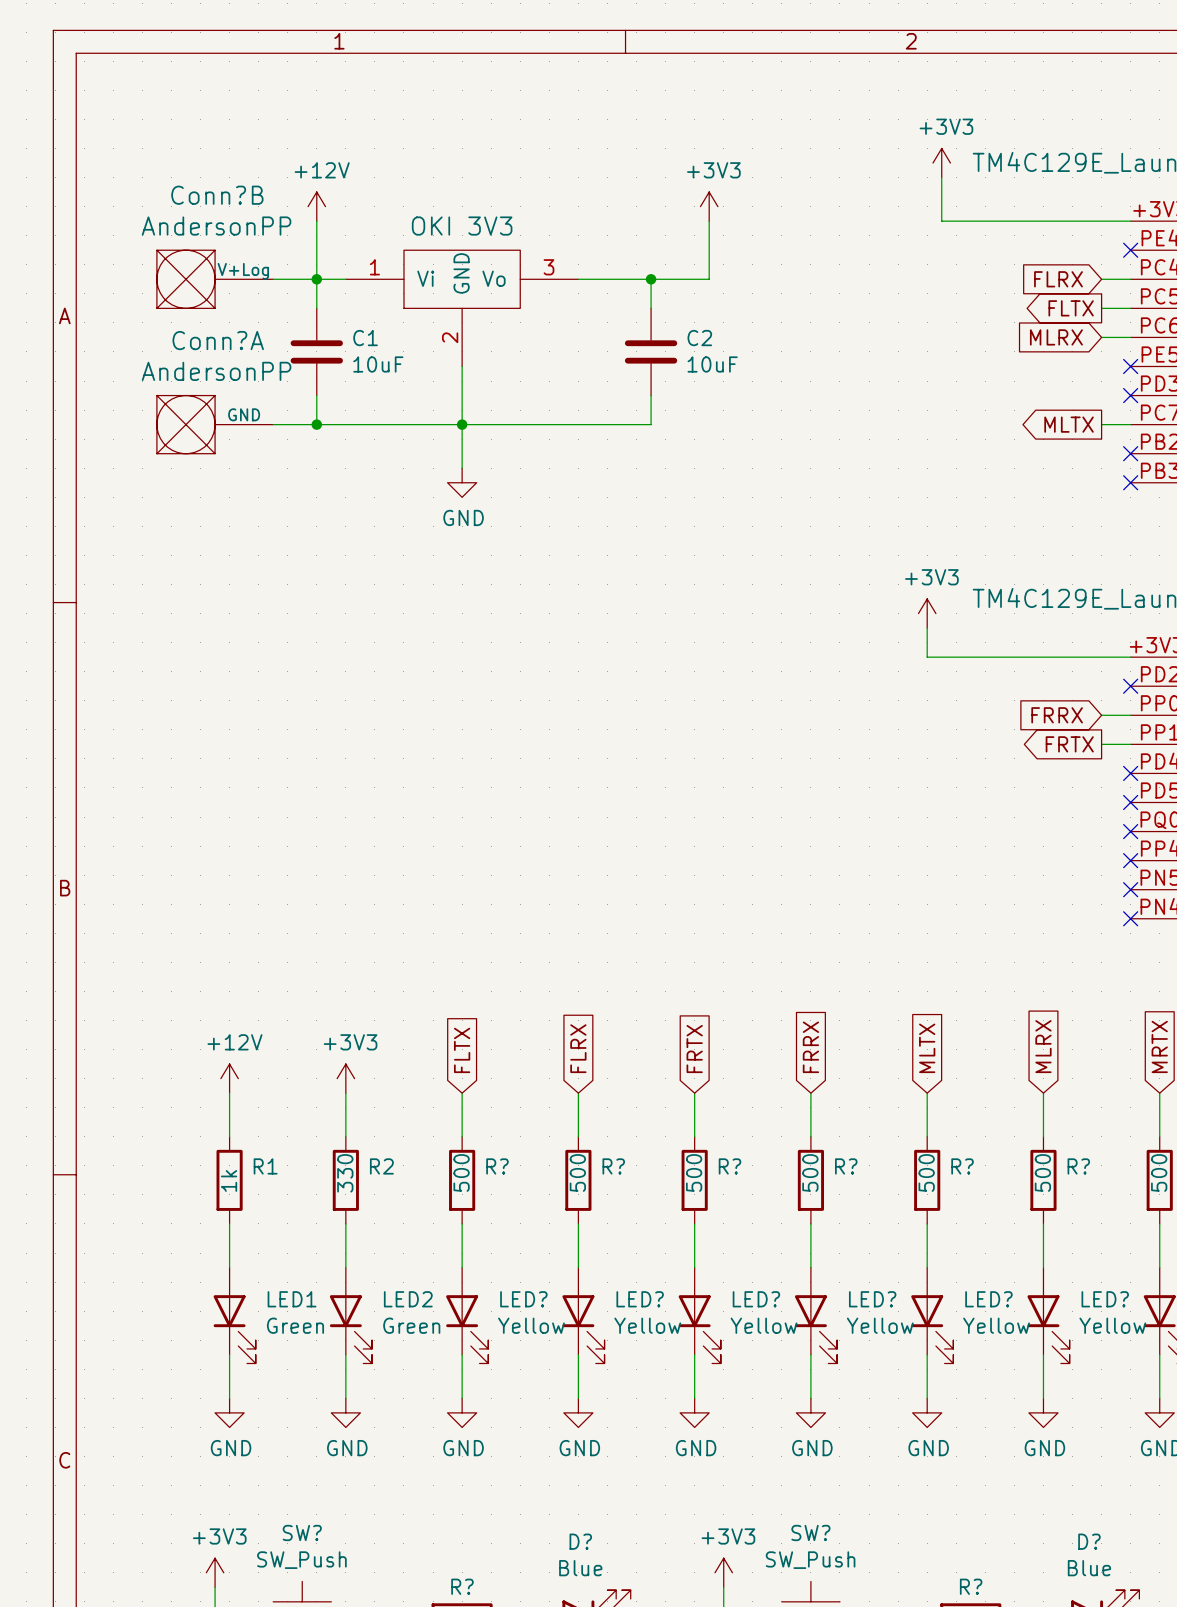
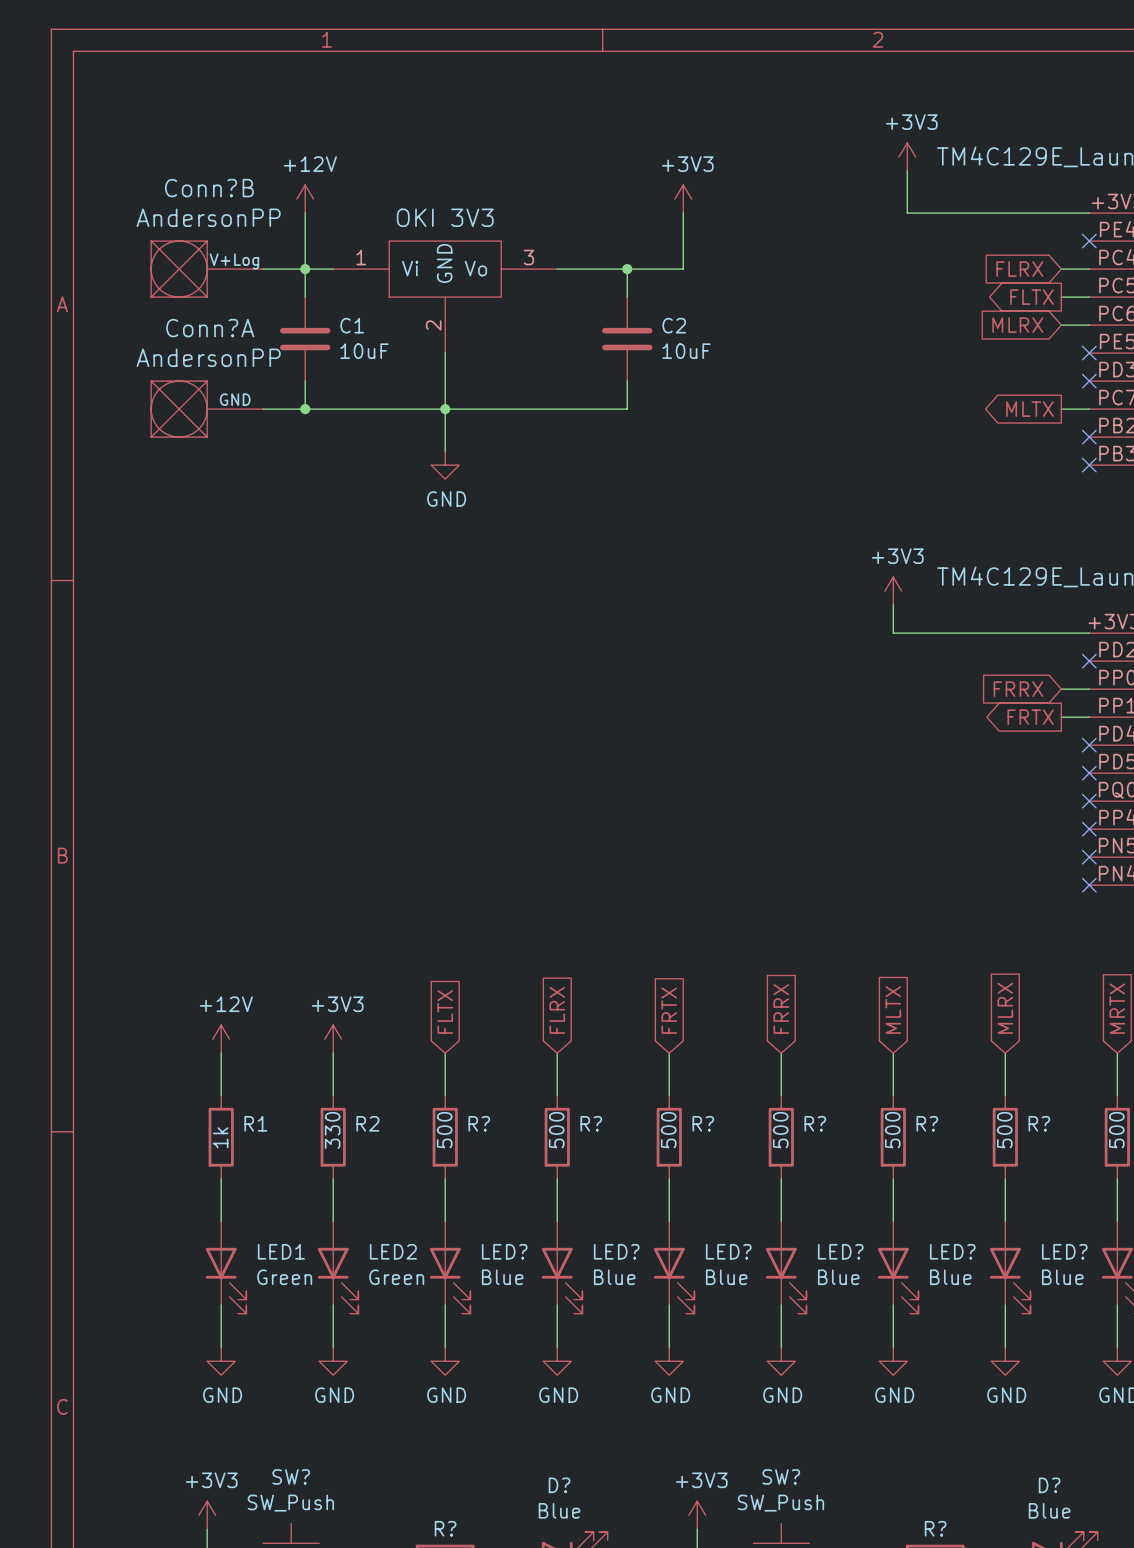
LED? value: Yellow (531, 1325) -> Blue (502, 1277)
LED? value: Yellow (647, 1325) -> Blue (614, 1277)
LED? value: Yellow (764, 1325) -> Blue (726, 1277)
LED? value: Yellow (880, 1325) -> Blue (838, 1277)
LED? value: Yellow (996, 1325) -> Blue (950, 1277)
LED? value: Yellow (1112, 1325) -> Blue (1062, 1277)

